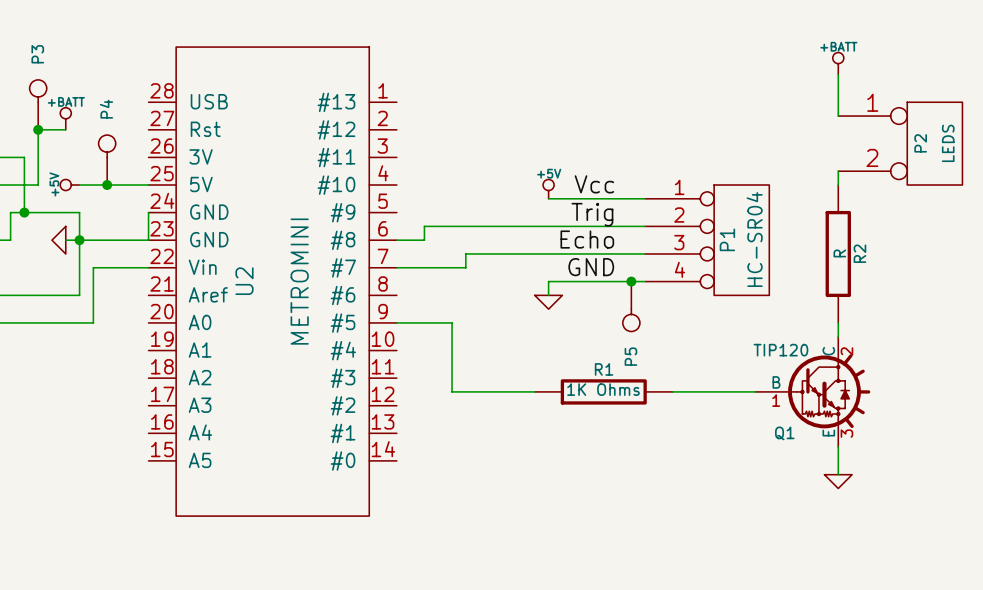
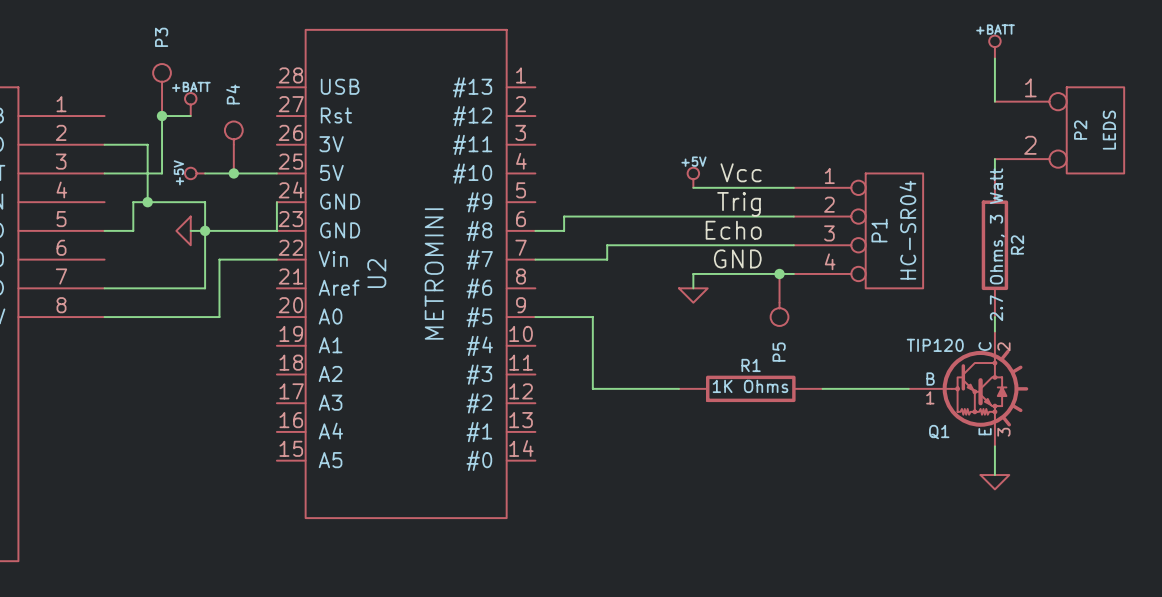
R2 value: R (839, 253) -> 2.7 Ohms, 3 Watt (997, 244)

